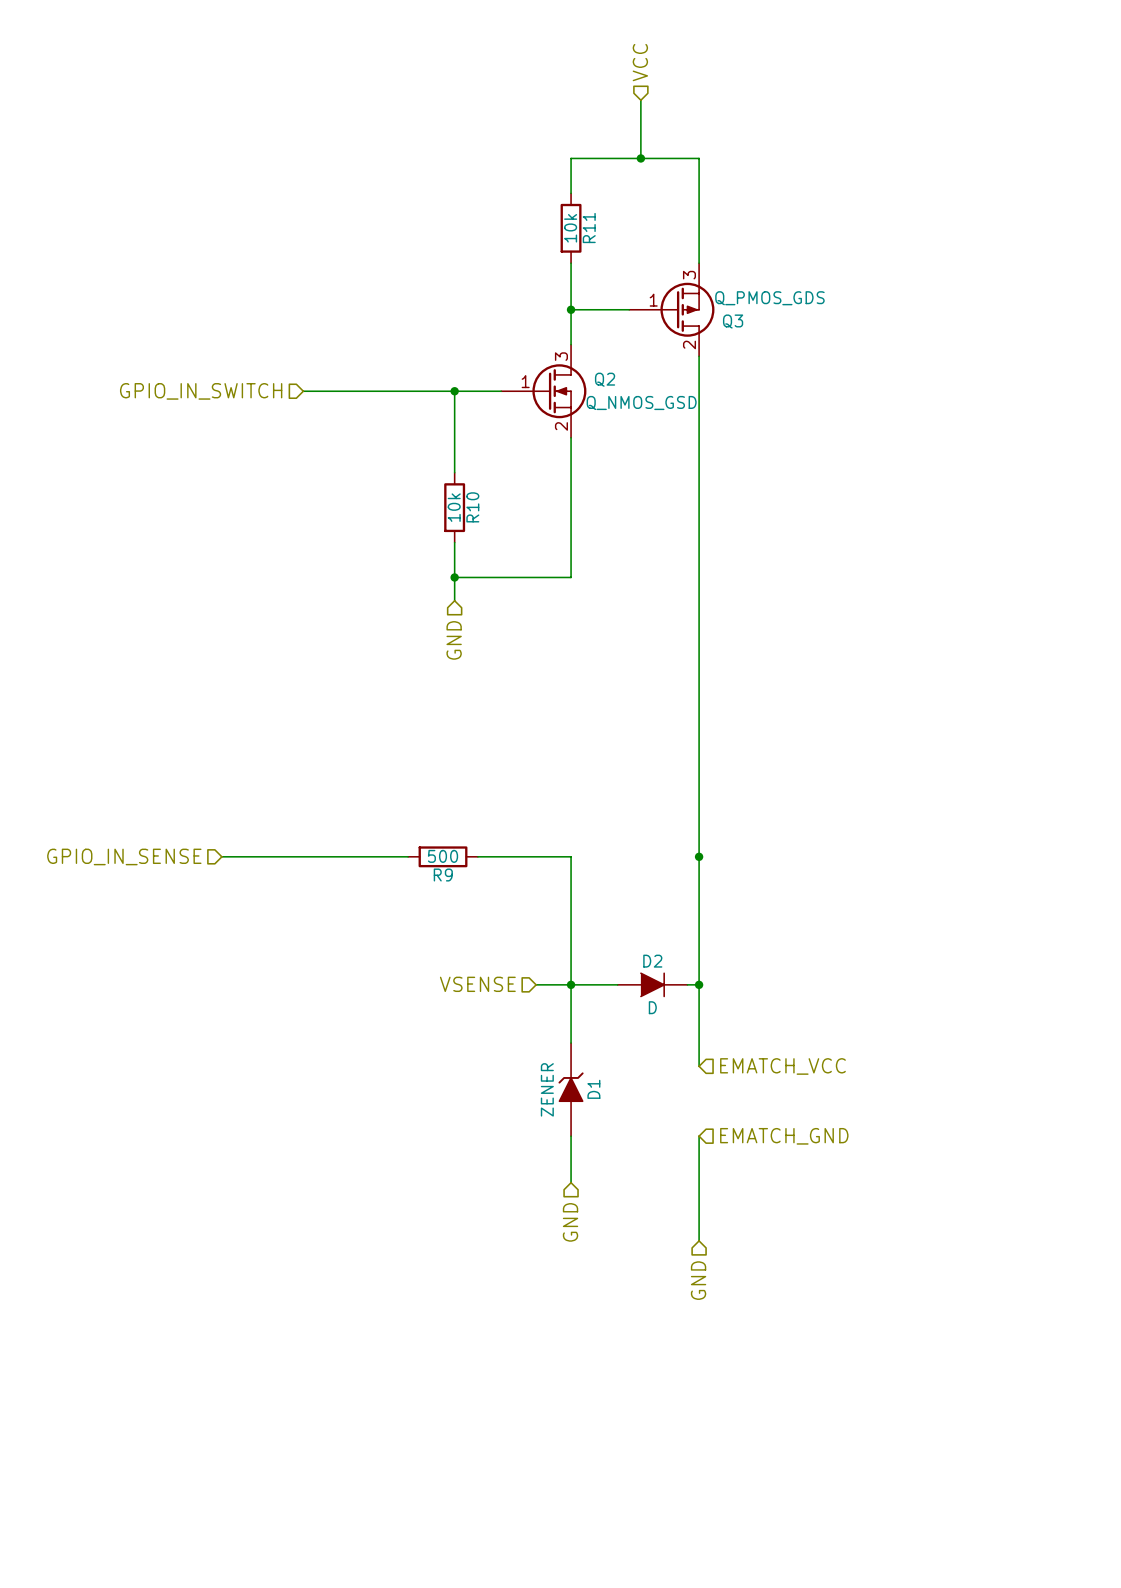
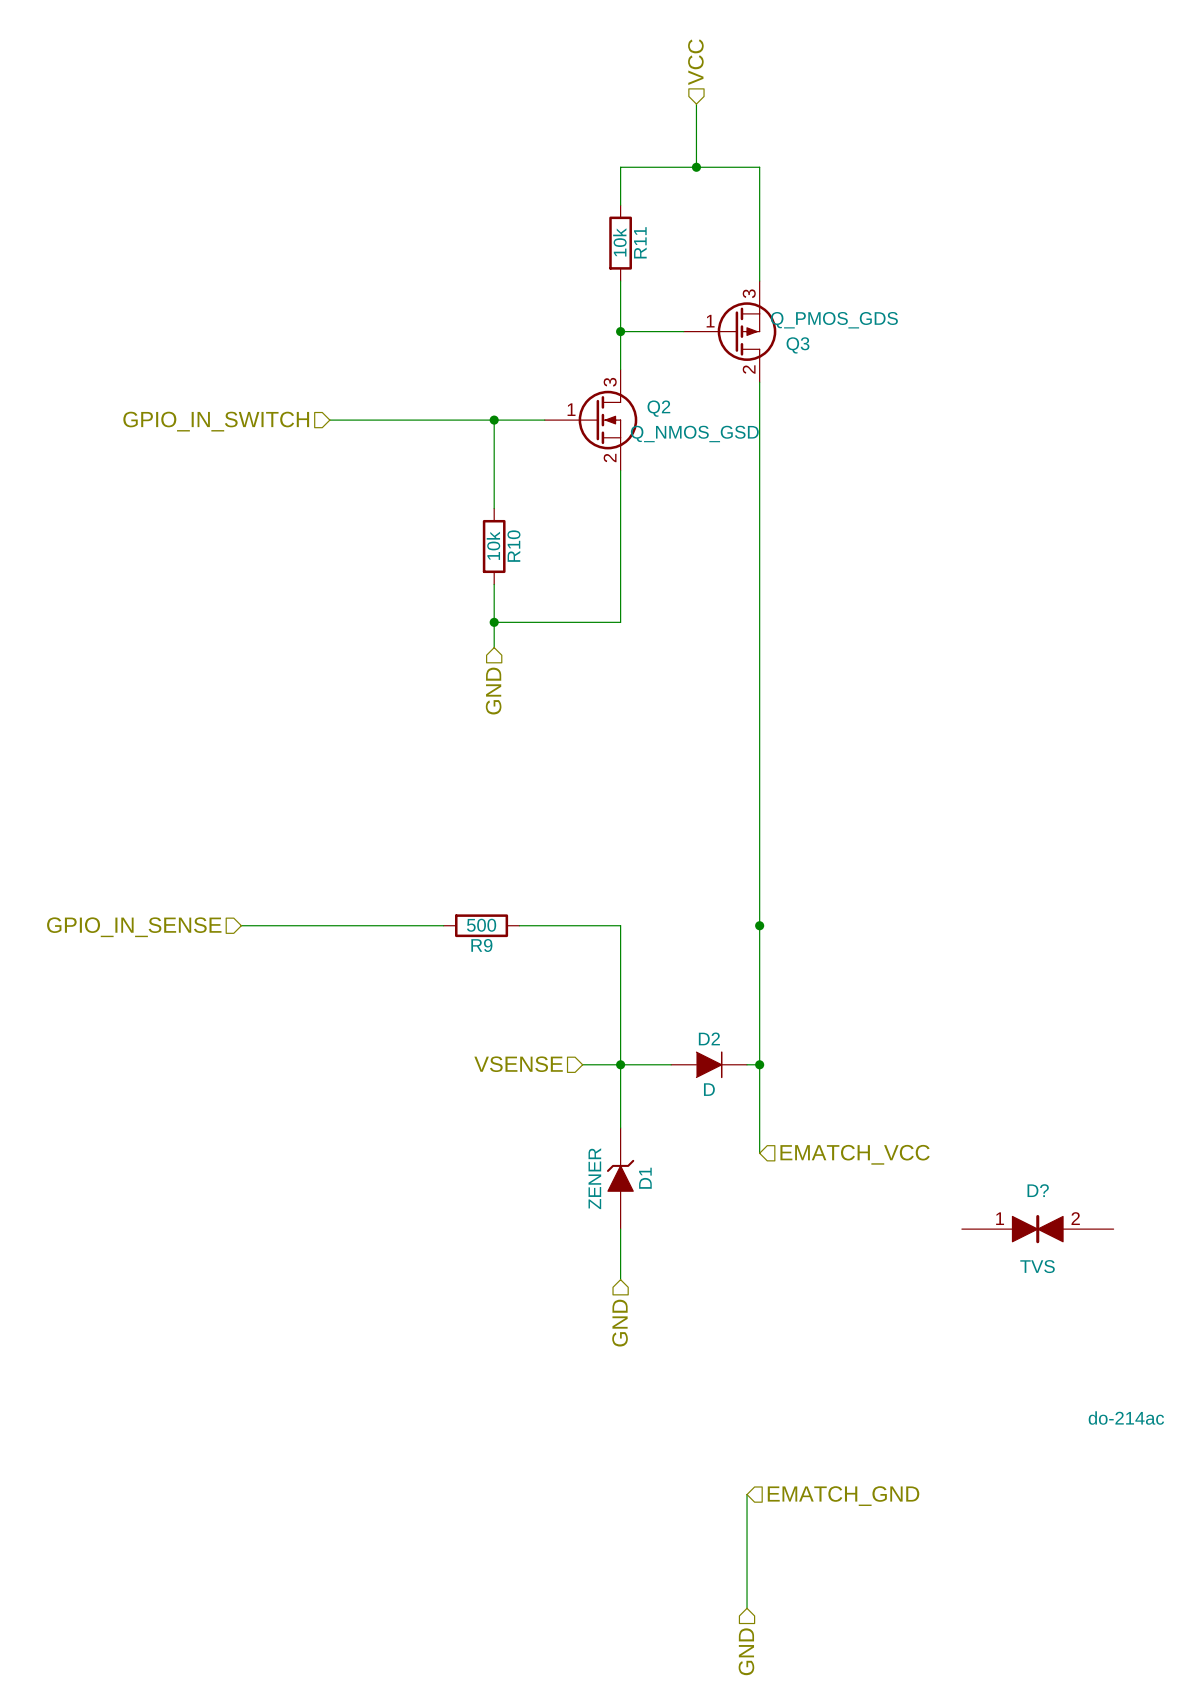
wire: (699, 1136) (699, 1240) -> none
hierarchical label: EMATCH_GND (784, 1136) -> none
D?: none -> TVS (1037, 1229)
hierarchical label: GND (698, 1280) -> none
wire: none -> (747, 1494) (747, 1608)
hierarchical label: none -> EMATCH_GND (843, 1496)
hierarchical label: none -> GND (746, 1651)

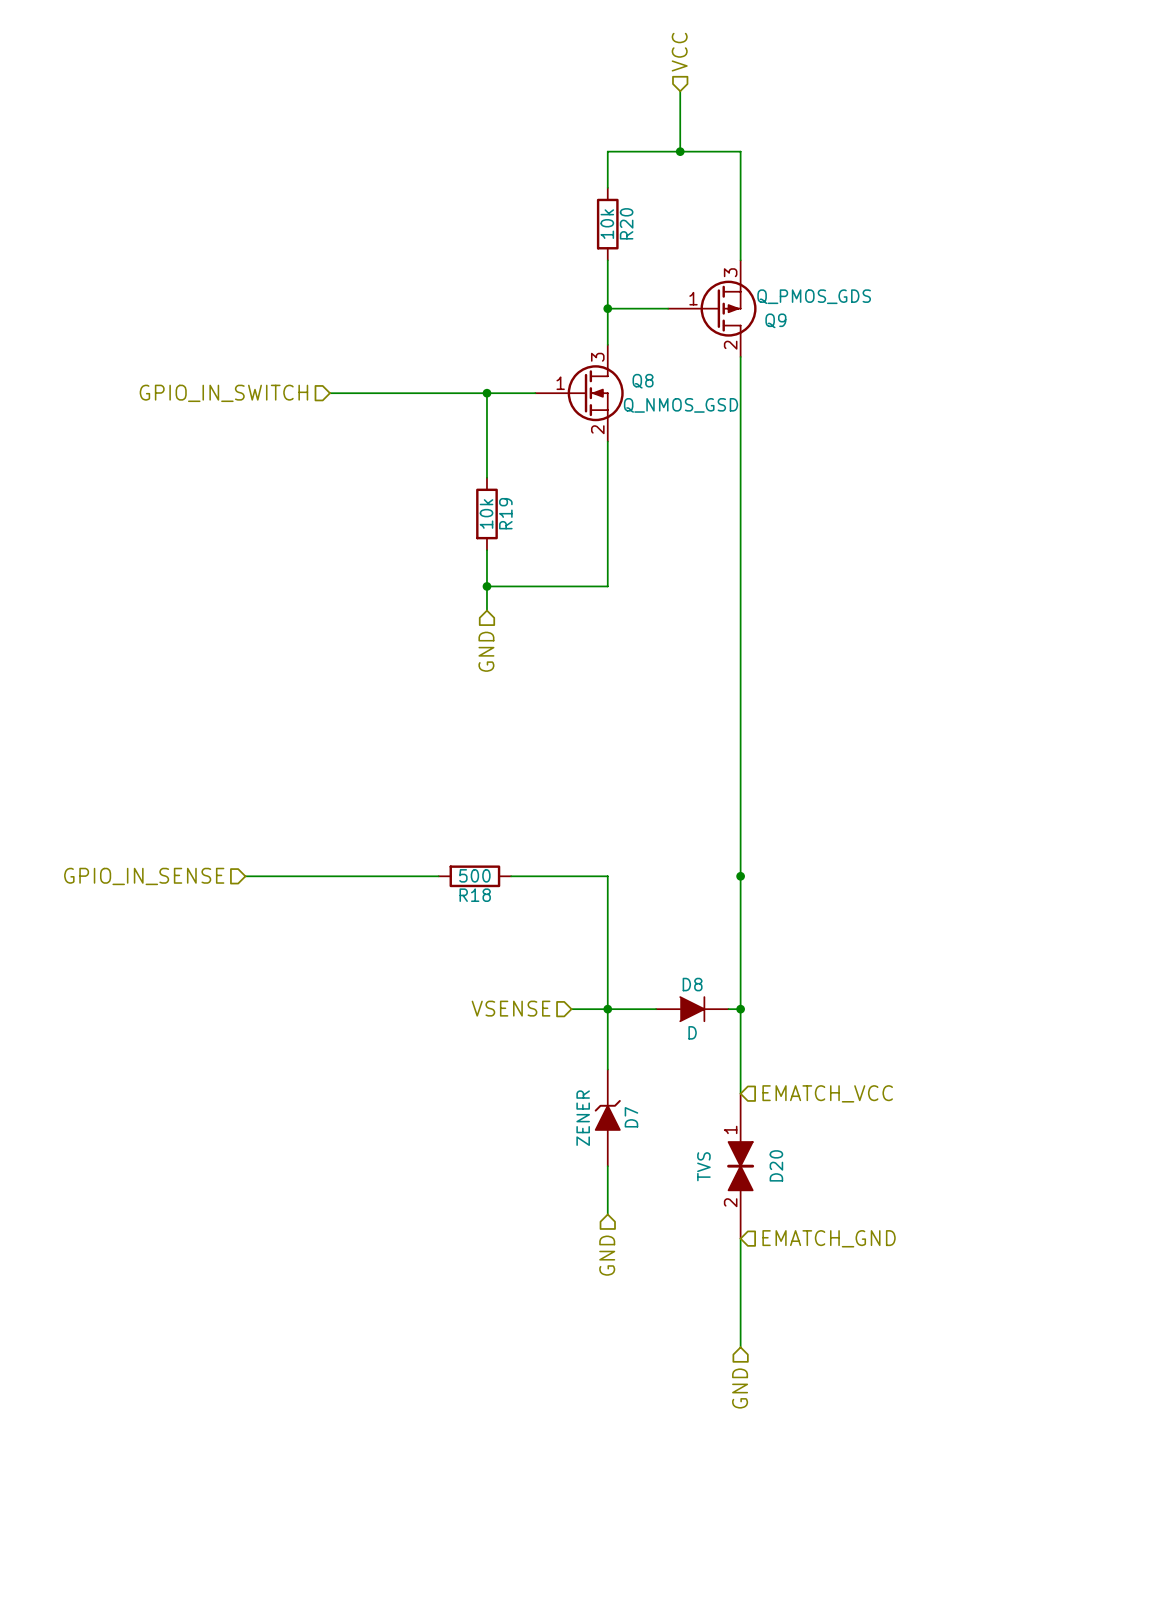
R11 name: R11 (640, 242) -> R20 (626, 223)
Q3 name: Q3 (797, 345) -> Q9 (775, 320)
Q2 name: Q2 (658, 408) -> Q8 (643, 381)
R10 name: R10 (513, 546) -> R19 (505, 513)
R9 name: R9 (481, 945) -> R18 (475, 895)
D2 name: D2 (709, 1038) -> D8 (692, 984)
D1 name: D1 (645, 1178) -> D7 (631, 1117)
D20: none -> TVS (740, 1166)
D?: TVS (1037, 1229) -> none
wire: (747, 1494) (747, 1608) -> (740, 1238) (740, 1347)
hierarchical label position: EMATCH_GND (843, 1496) -> EMATCH_GND (829, 1238)
hierarchical label position: GND (746, 1651) -> GND (740, 1388)

